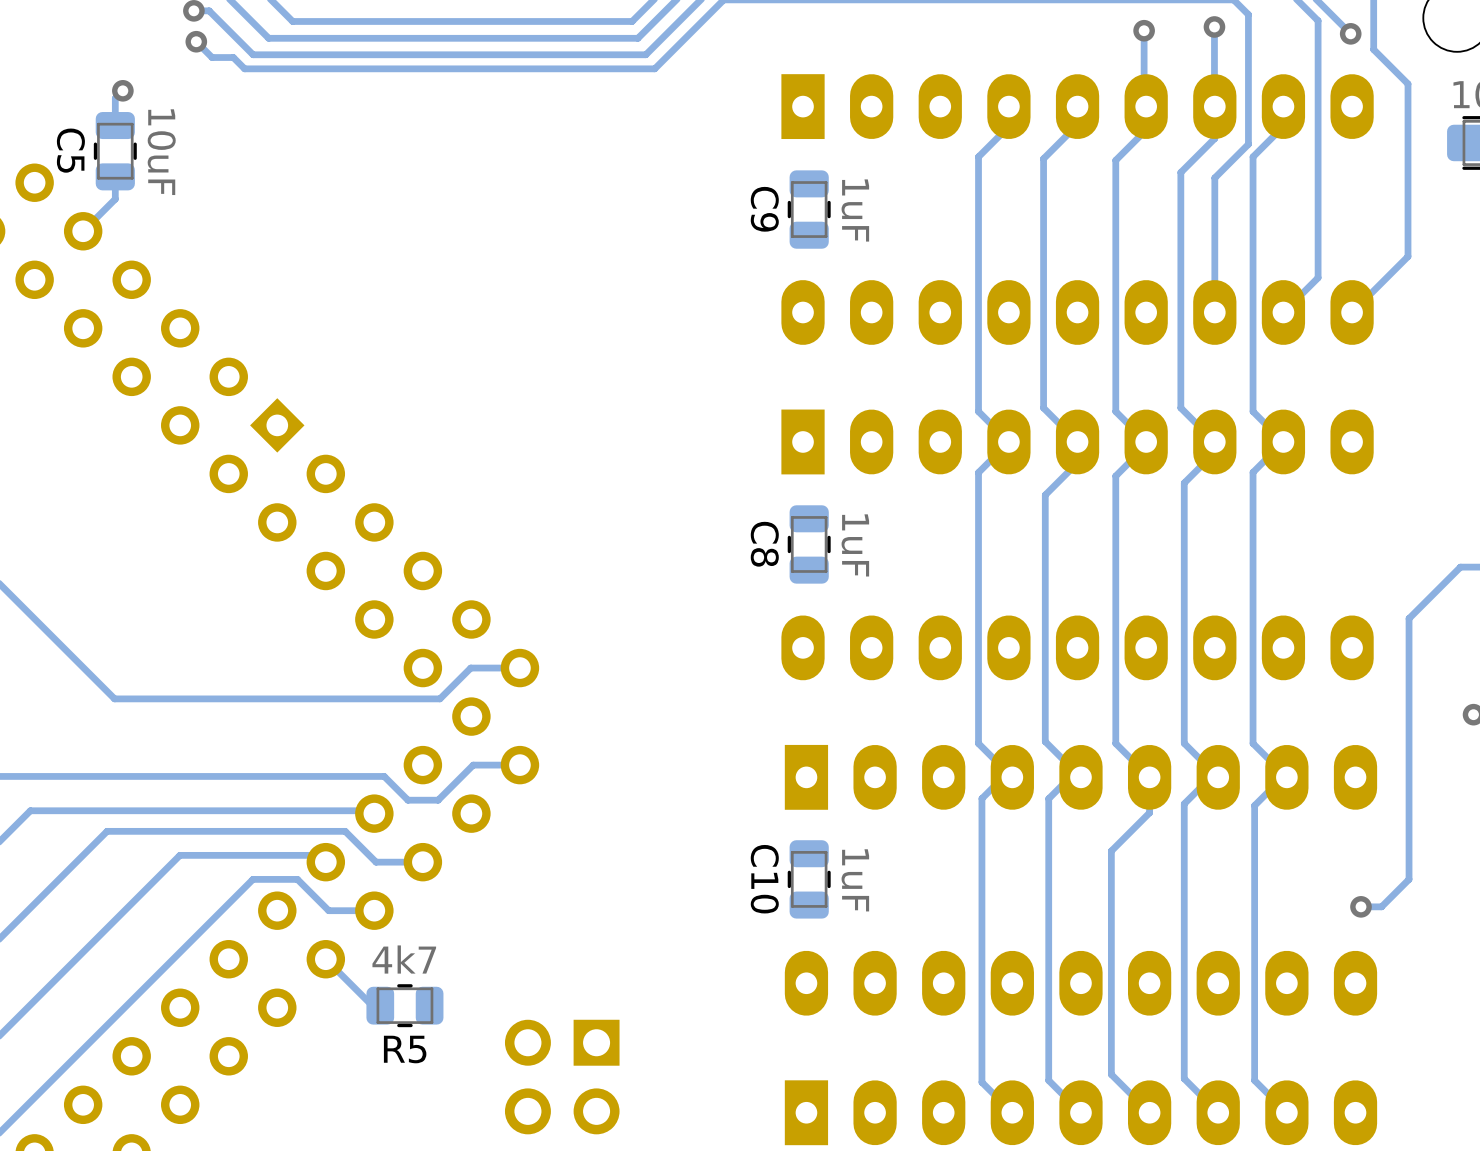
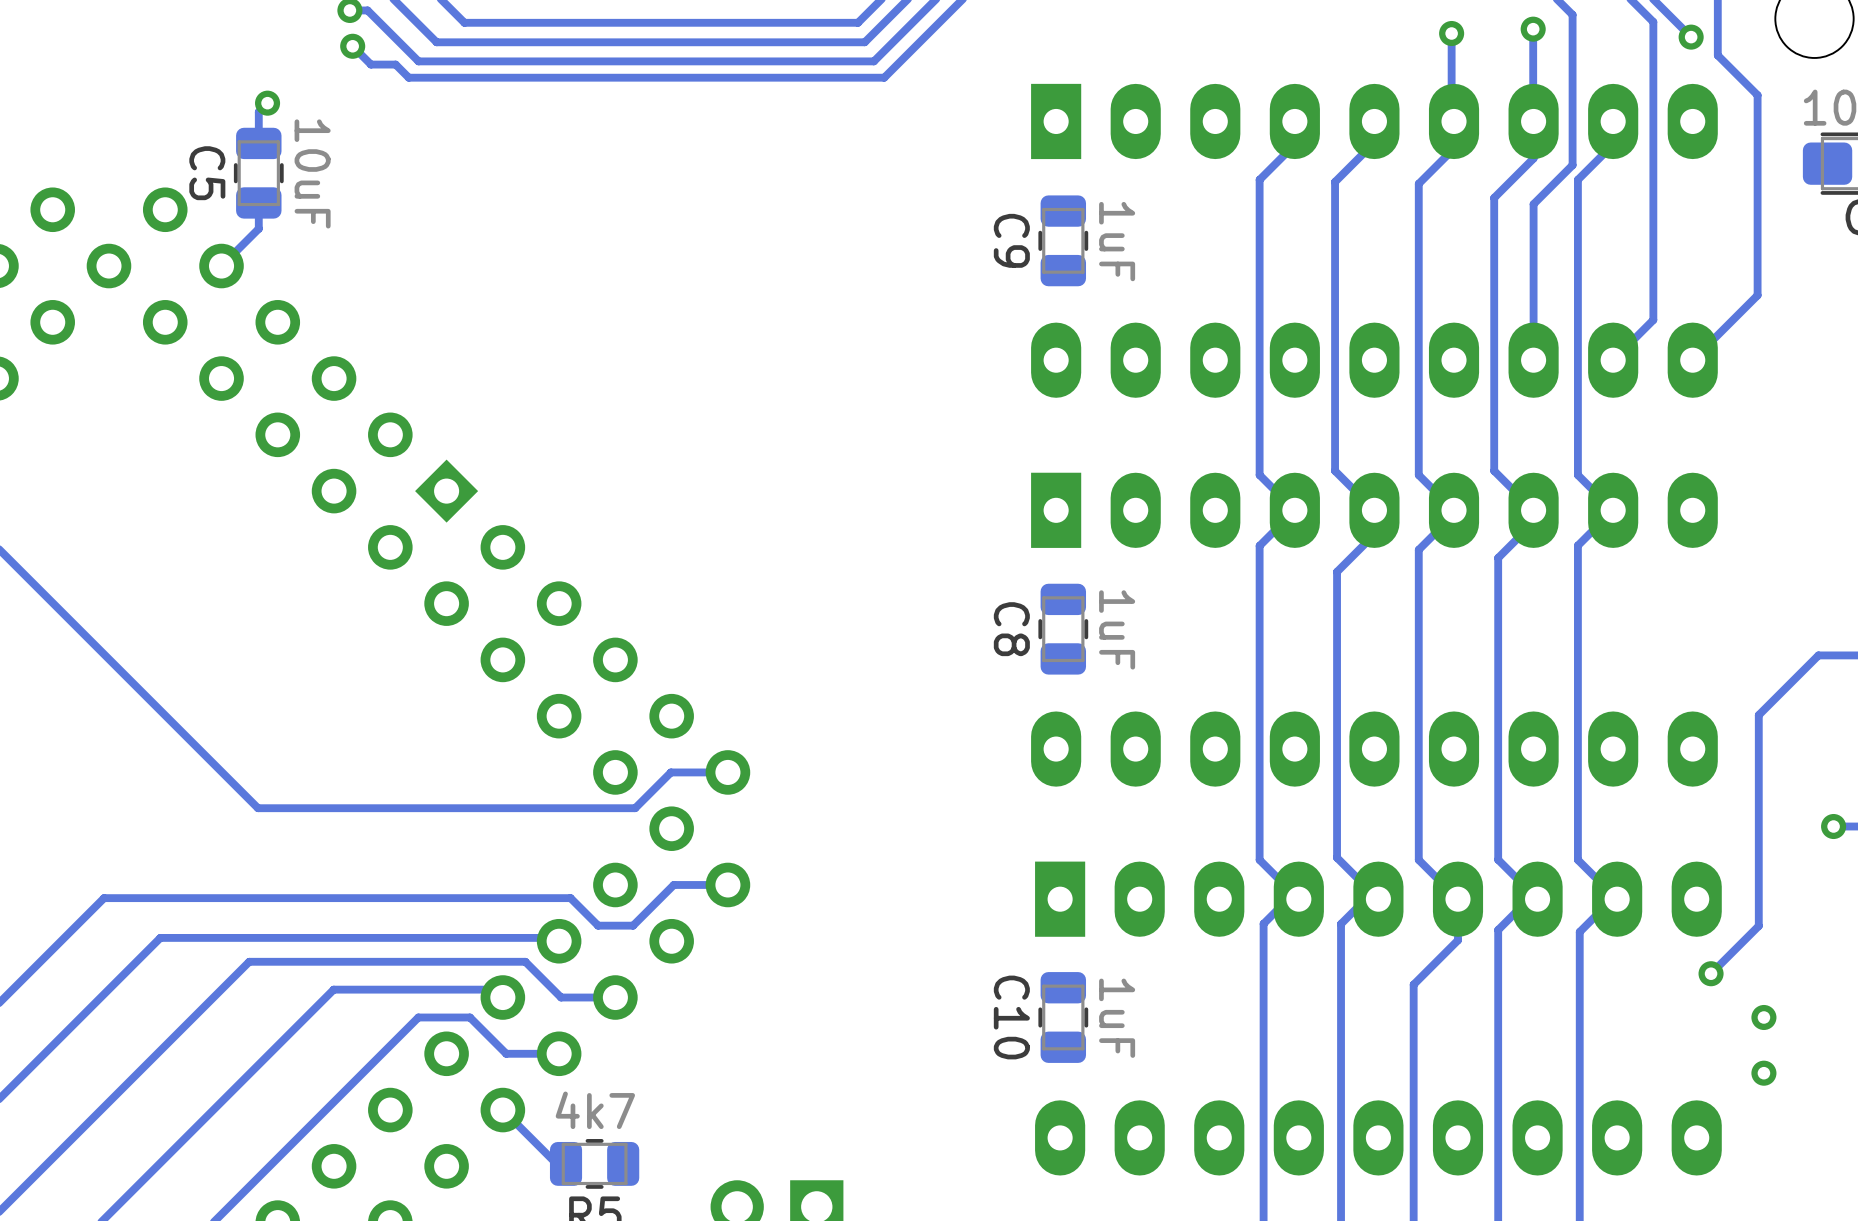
track: (1409, 800) (1409, 879) (1381, 906) (1361, 906) -> (1758, 925) (1711, 973)
via: none -> (1711, 973)
via: none -> (1763, 1017)
via: (1361, 906) -> none
via: none -> (1763, 1073)

